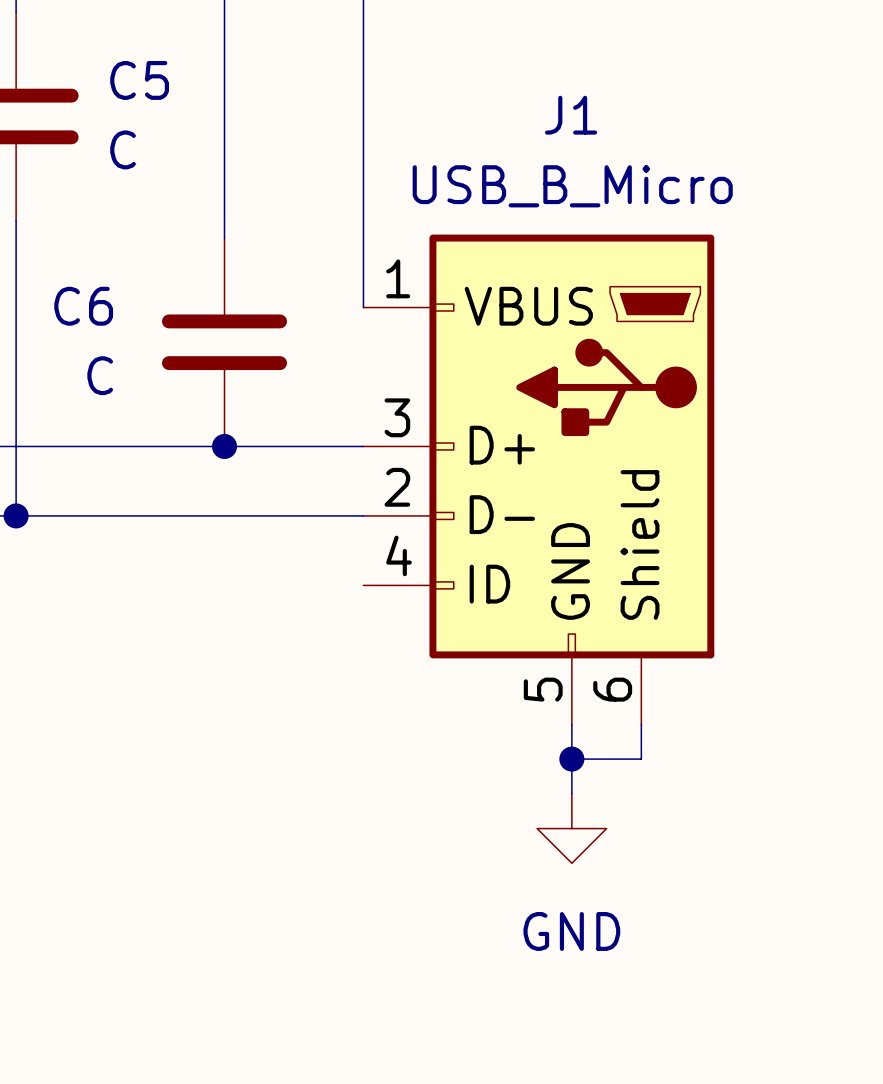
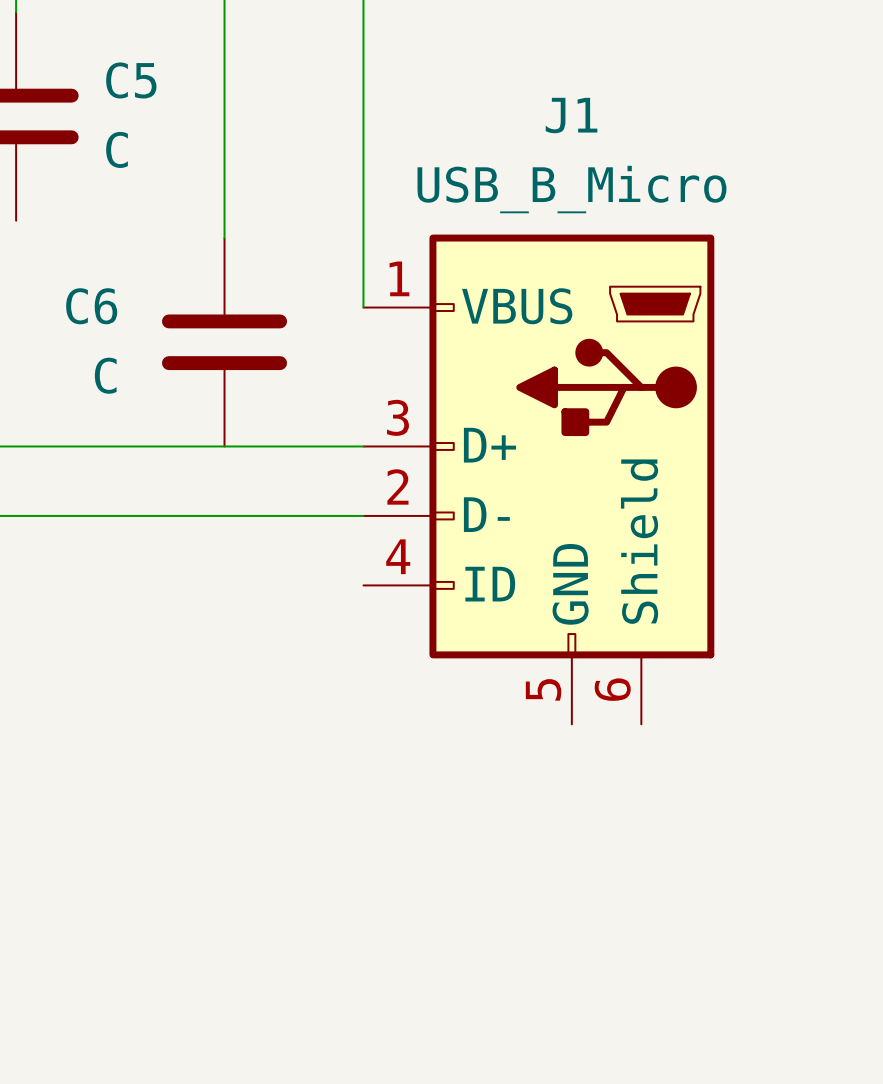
wire: (16, 220) (16, 515) -> none
junction: (224, 446) -> none
junction: (16, 515) -> none
wire: (571, 724) (571, 793) -> none
wire: (641, 724) (641, 759) (571, 759) -> none
junction: (571, 759) -> none
power symbol: GND (571, 828) -> none

